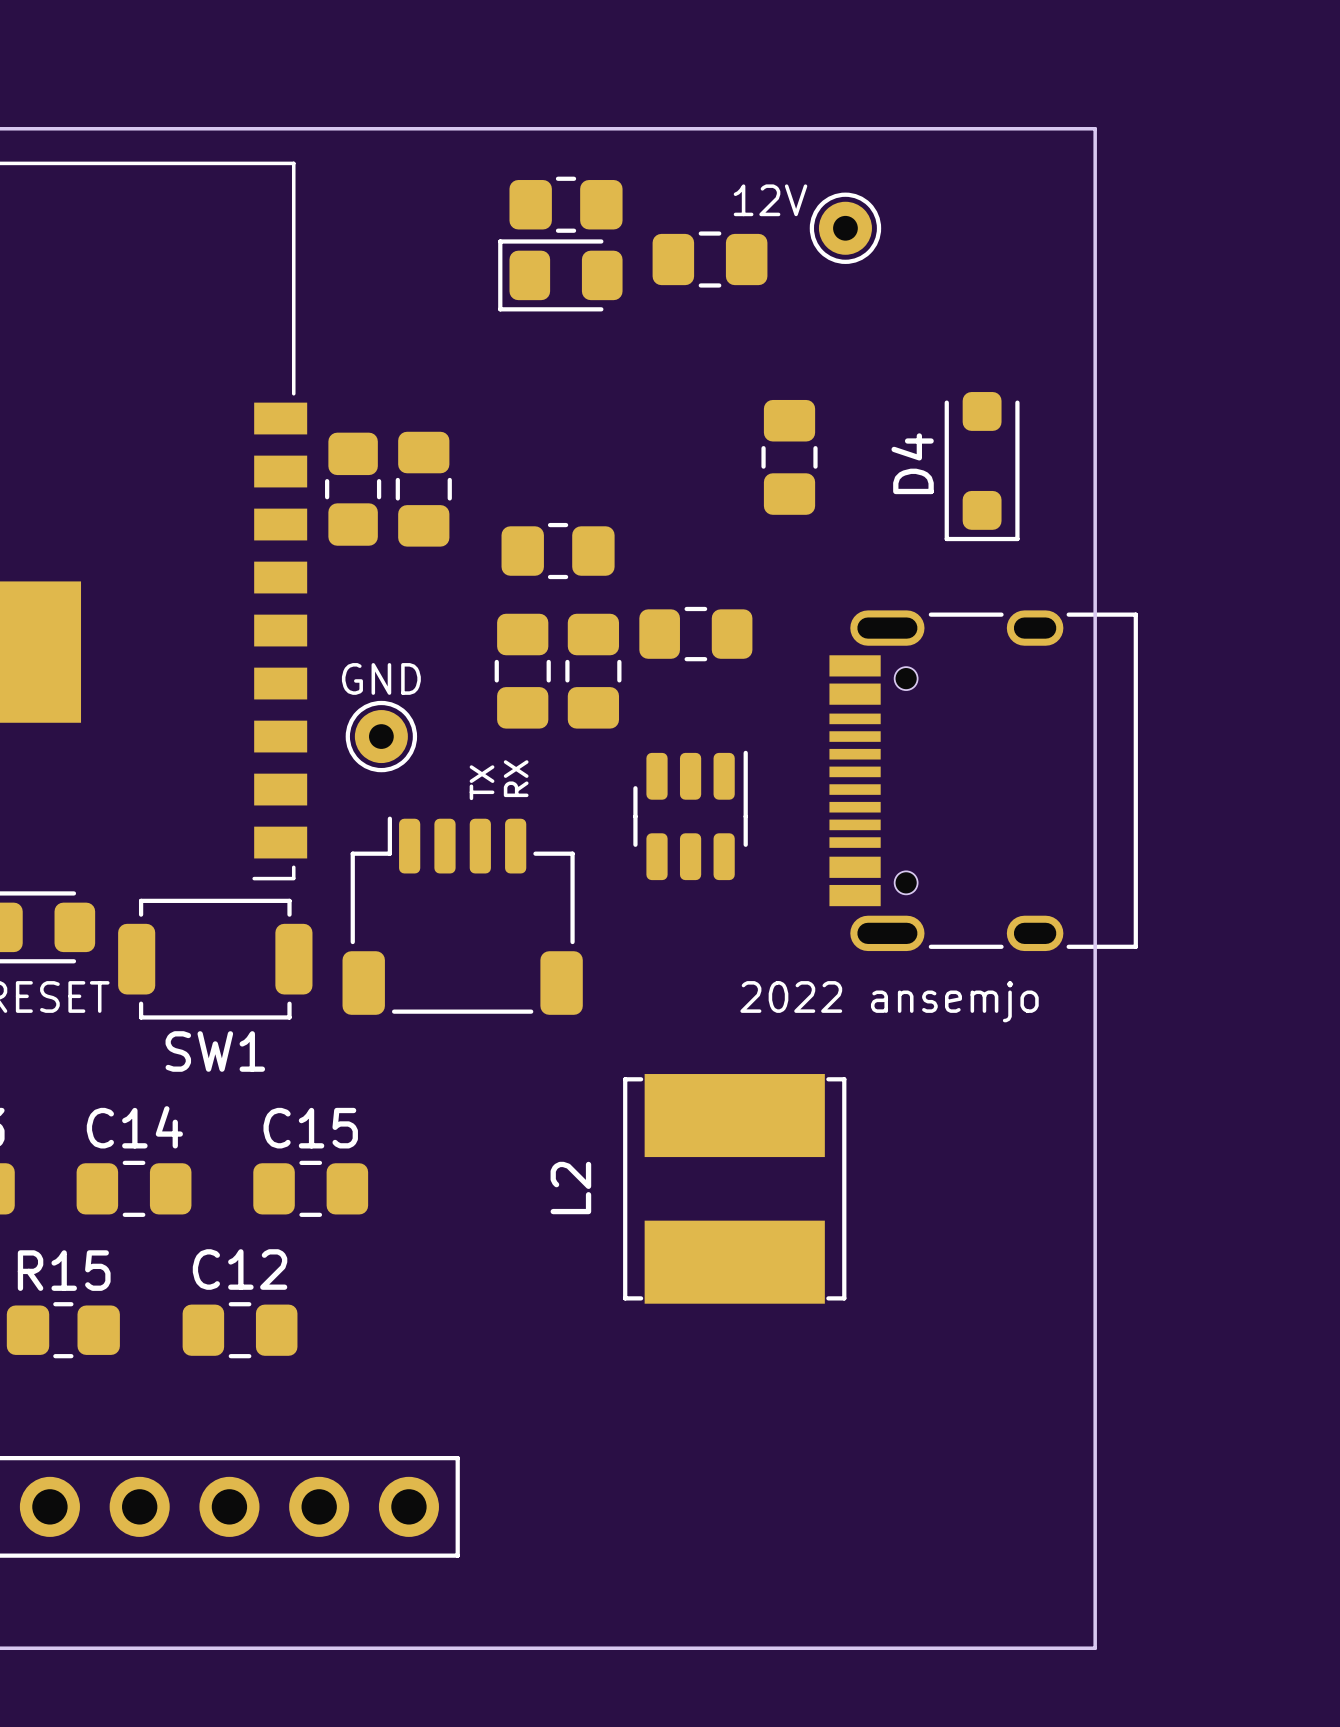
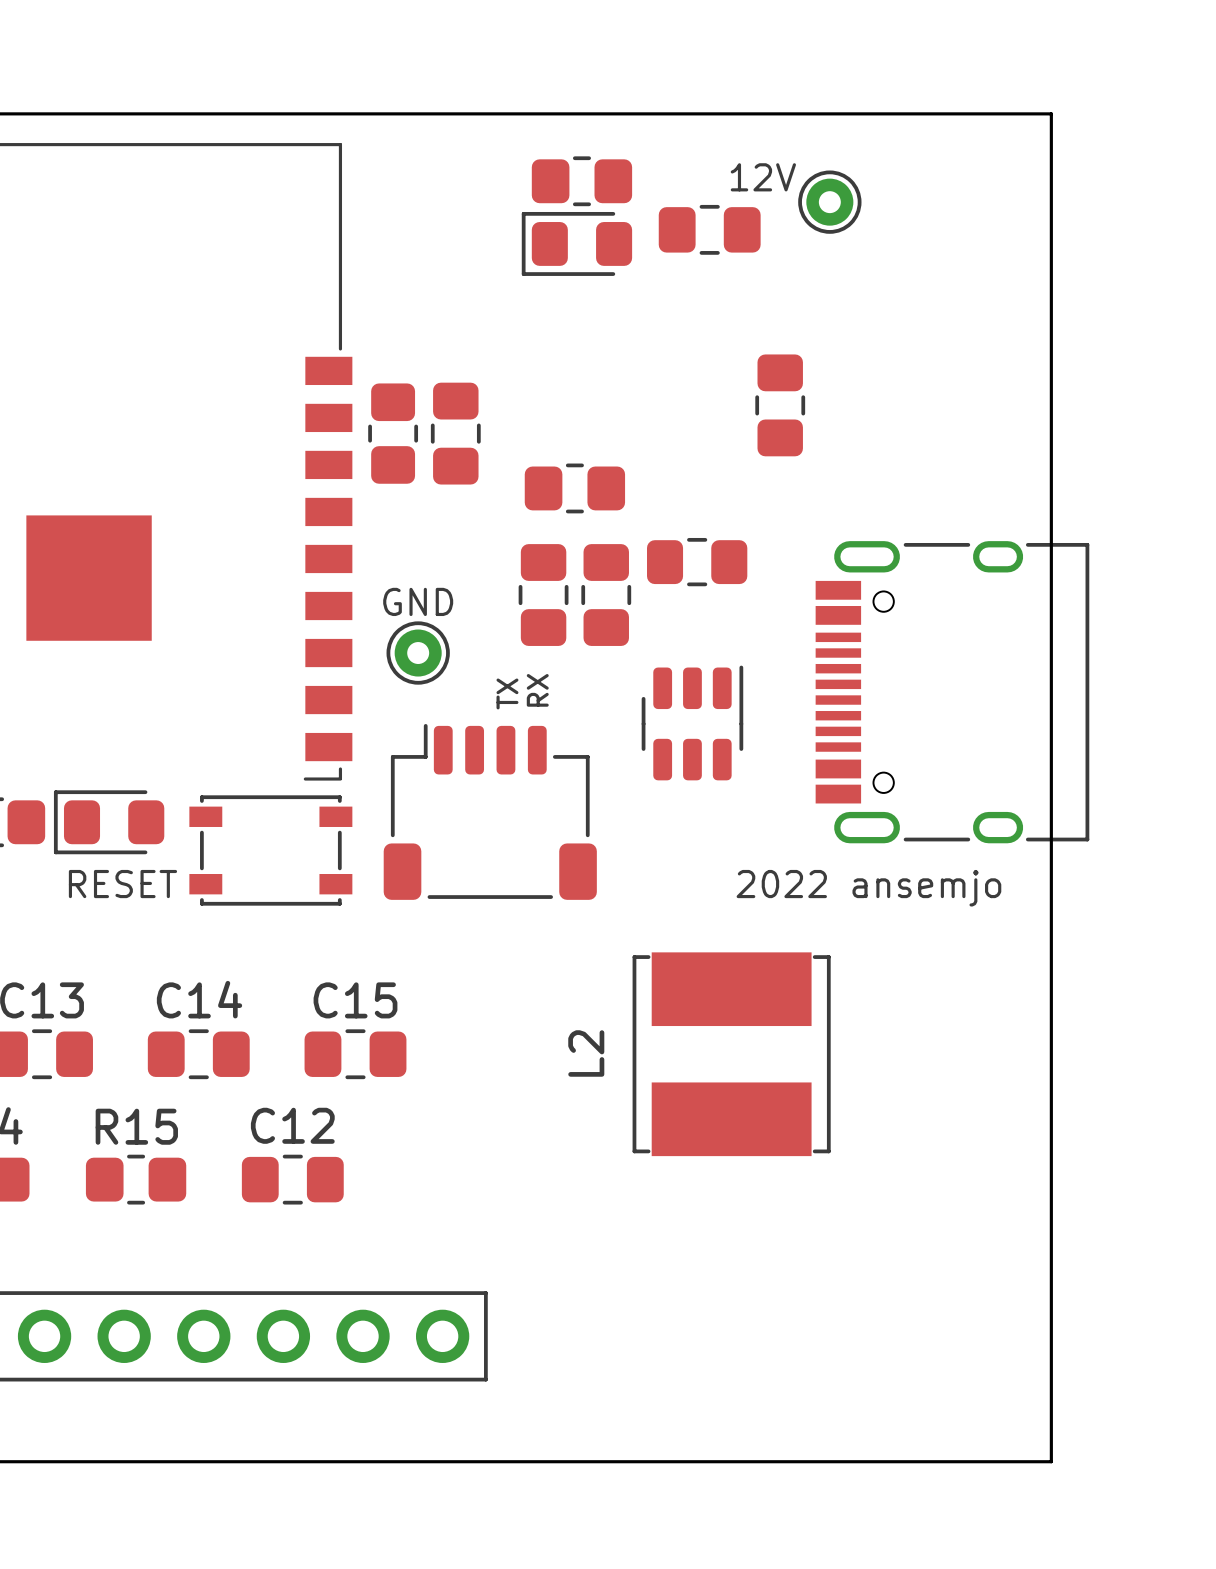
D4: (982, 466) -> none
SW1: (215, 959) -> none
part: none -> (270, 850)

